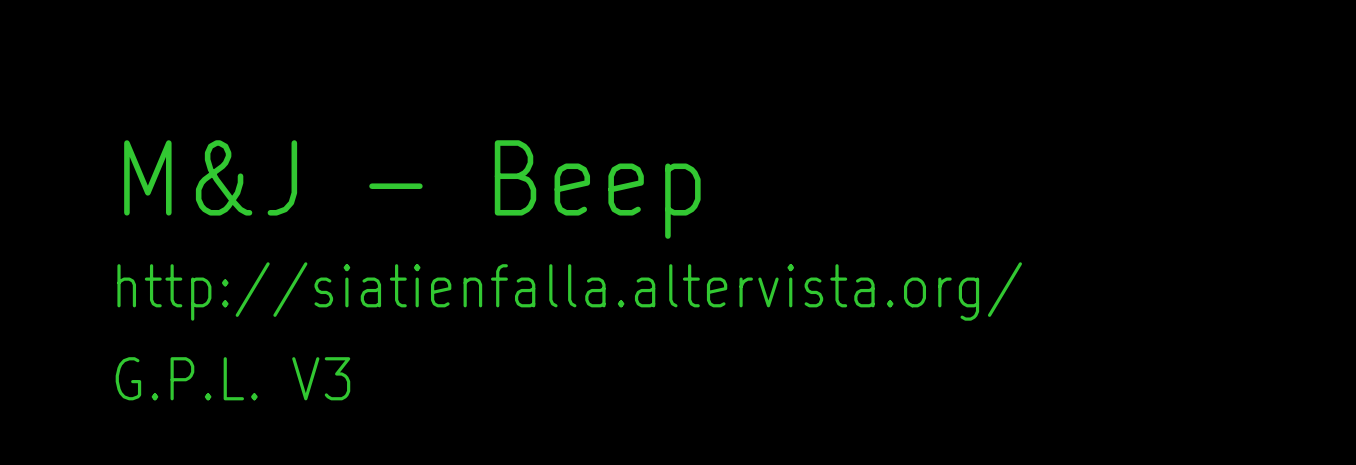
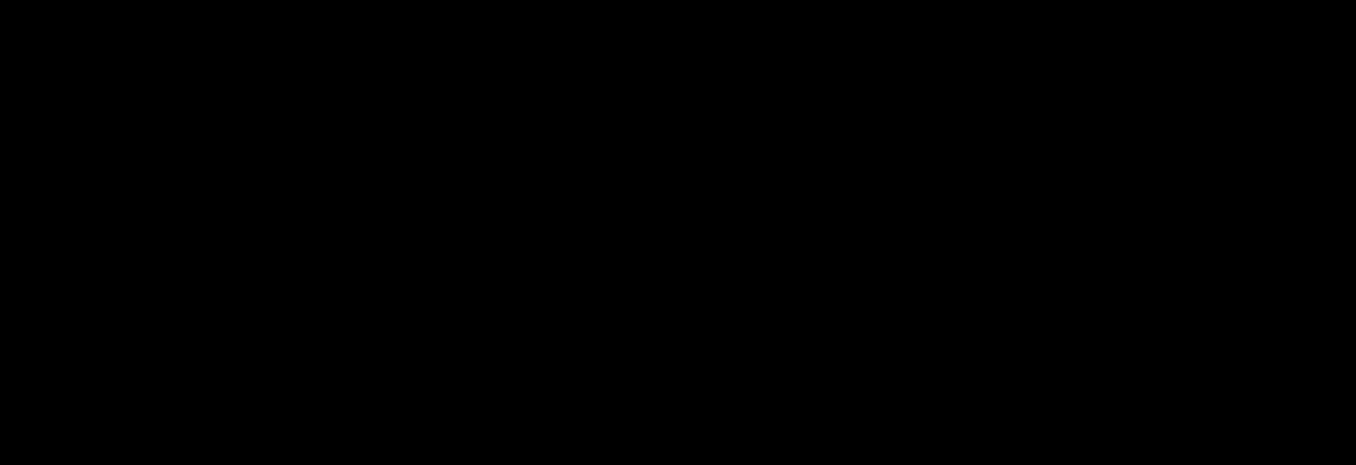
text: M&J - Beep (412, 189) -> none
text: http://siatienfalla.altervista.org/ (569, 291) -> none
text: G.P.L. V3 (232, 378) -> none

